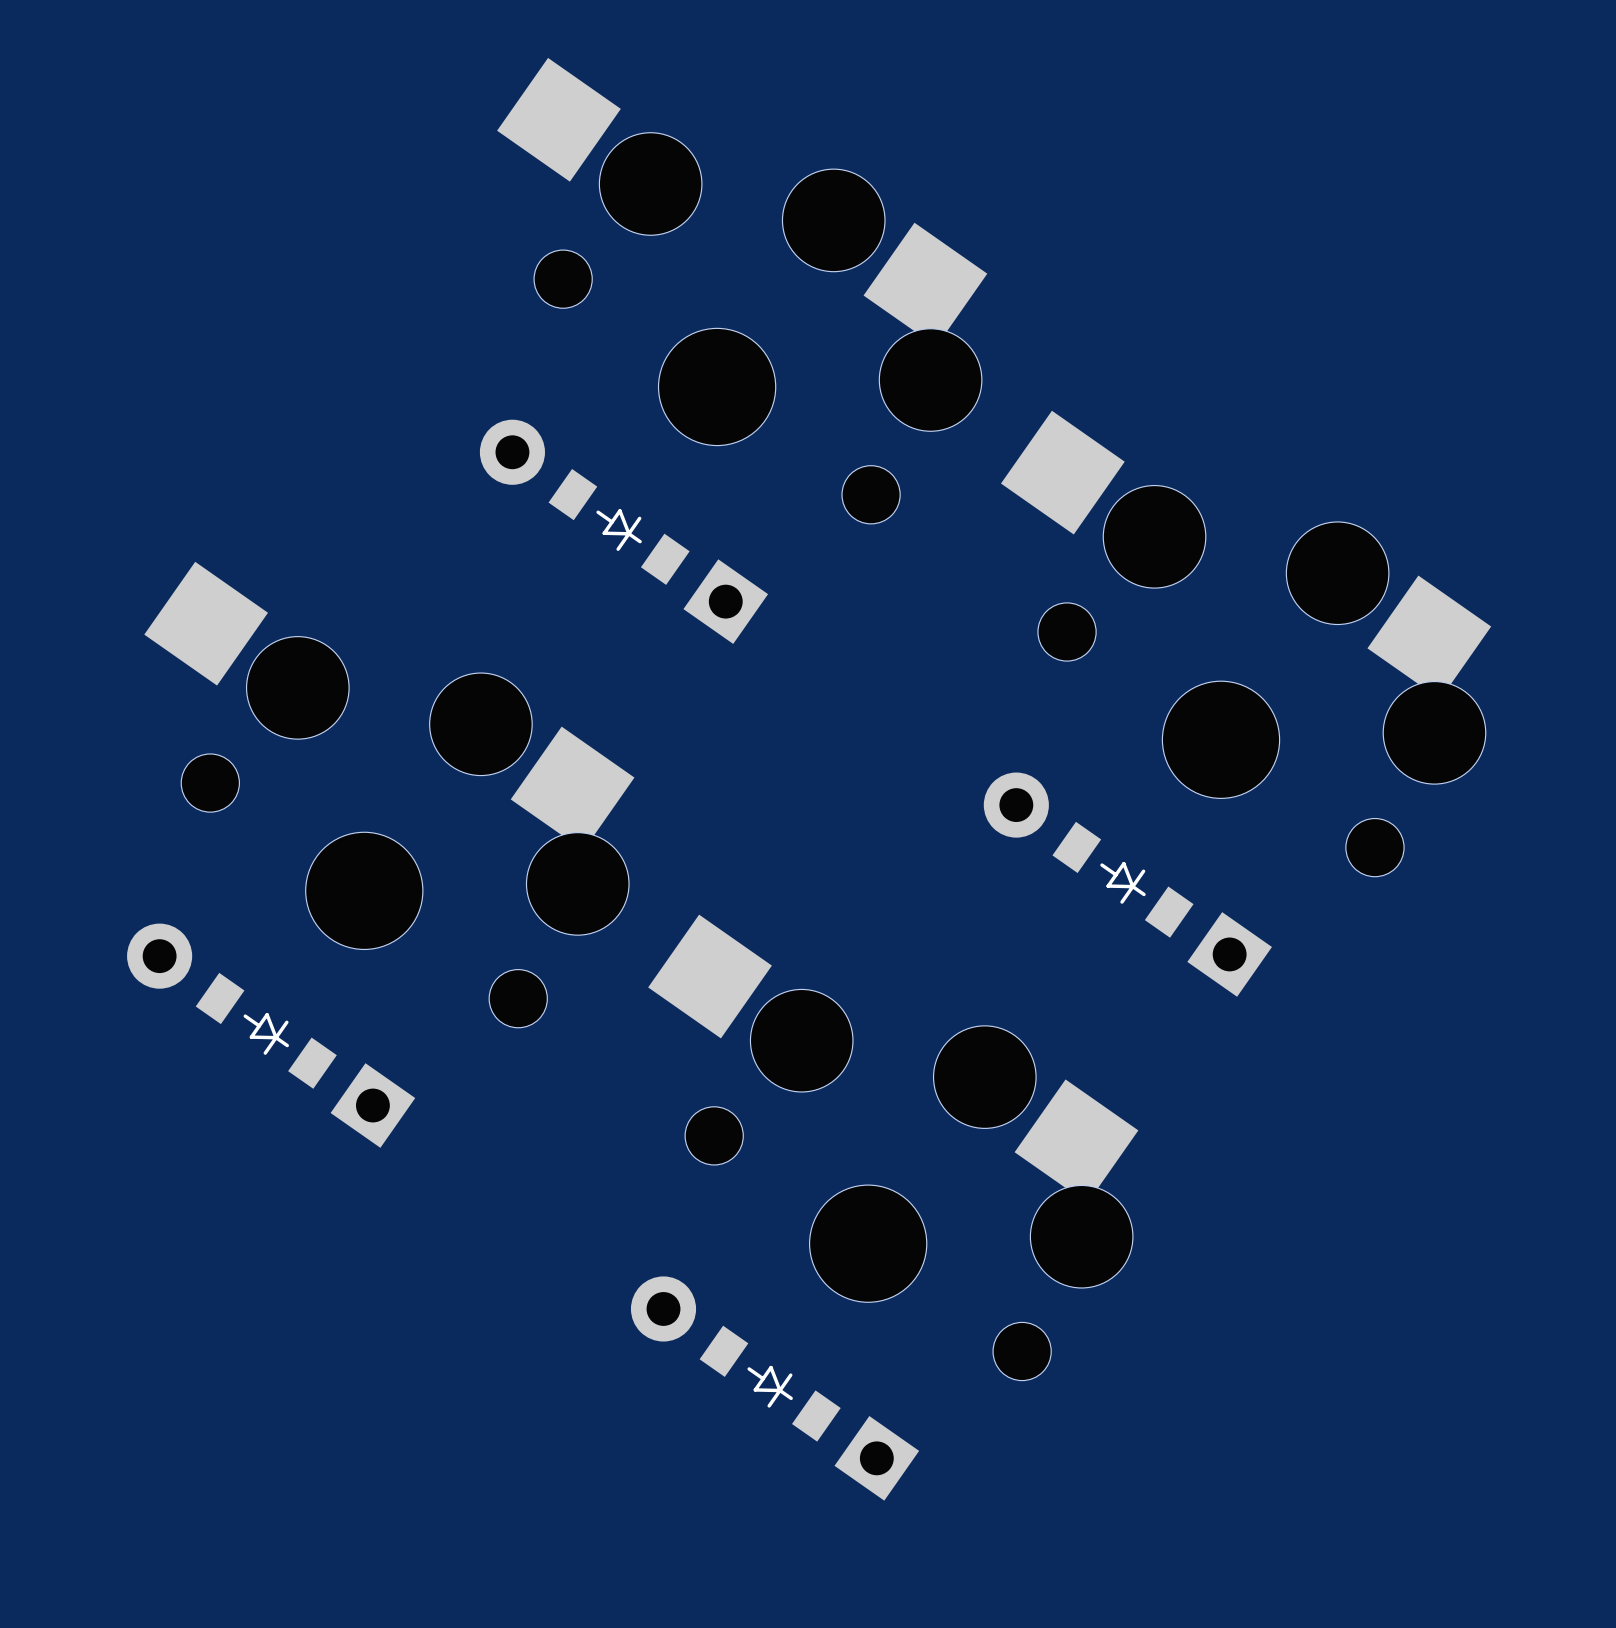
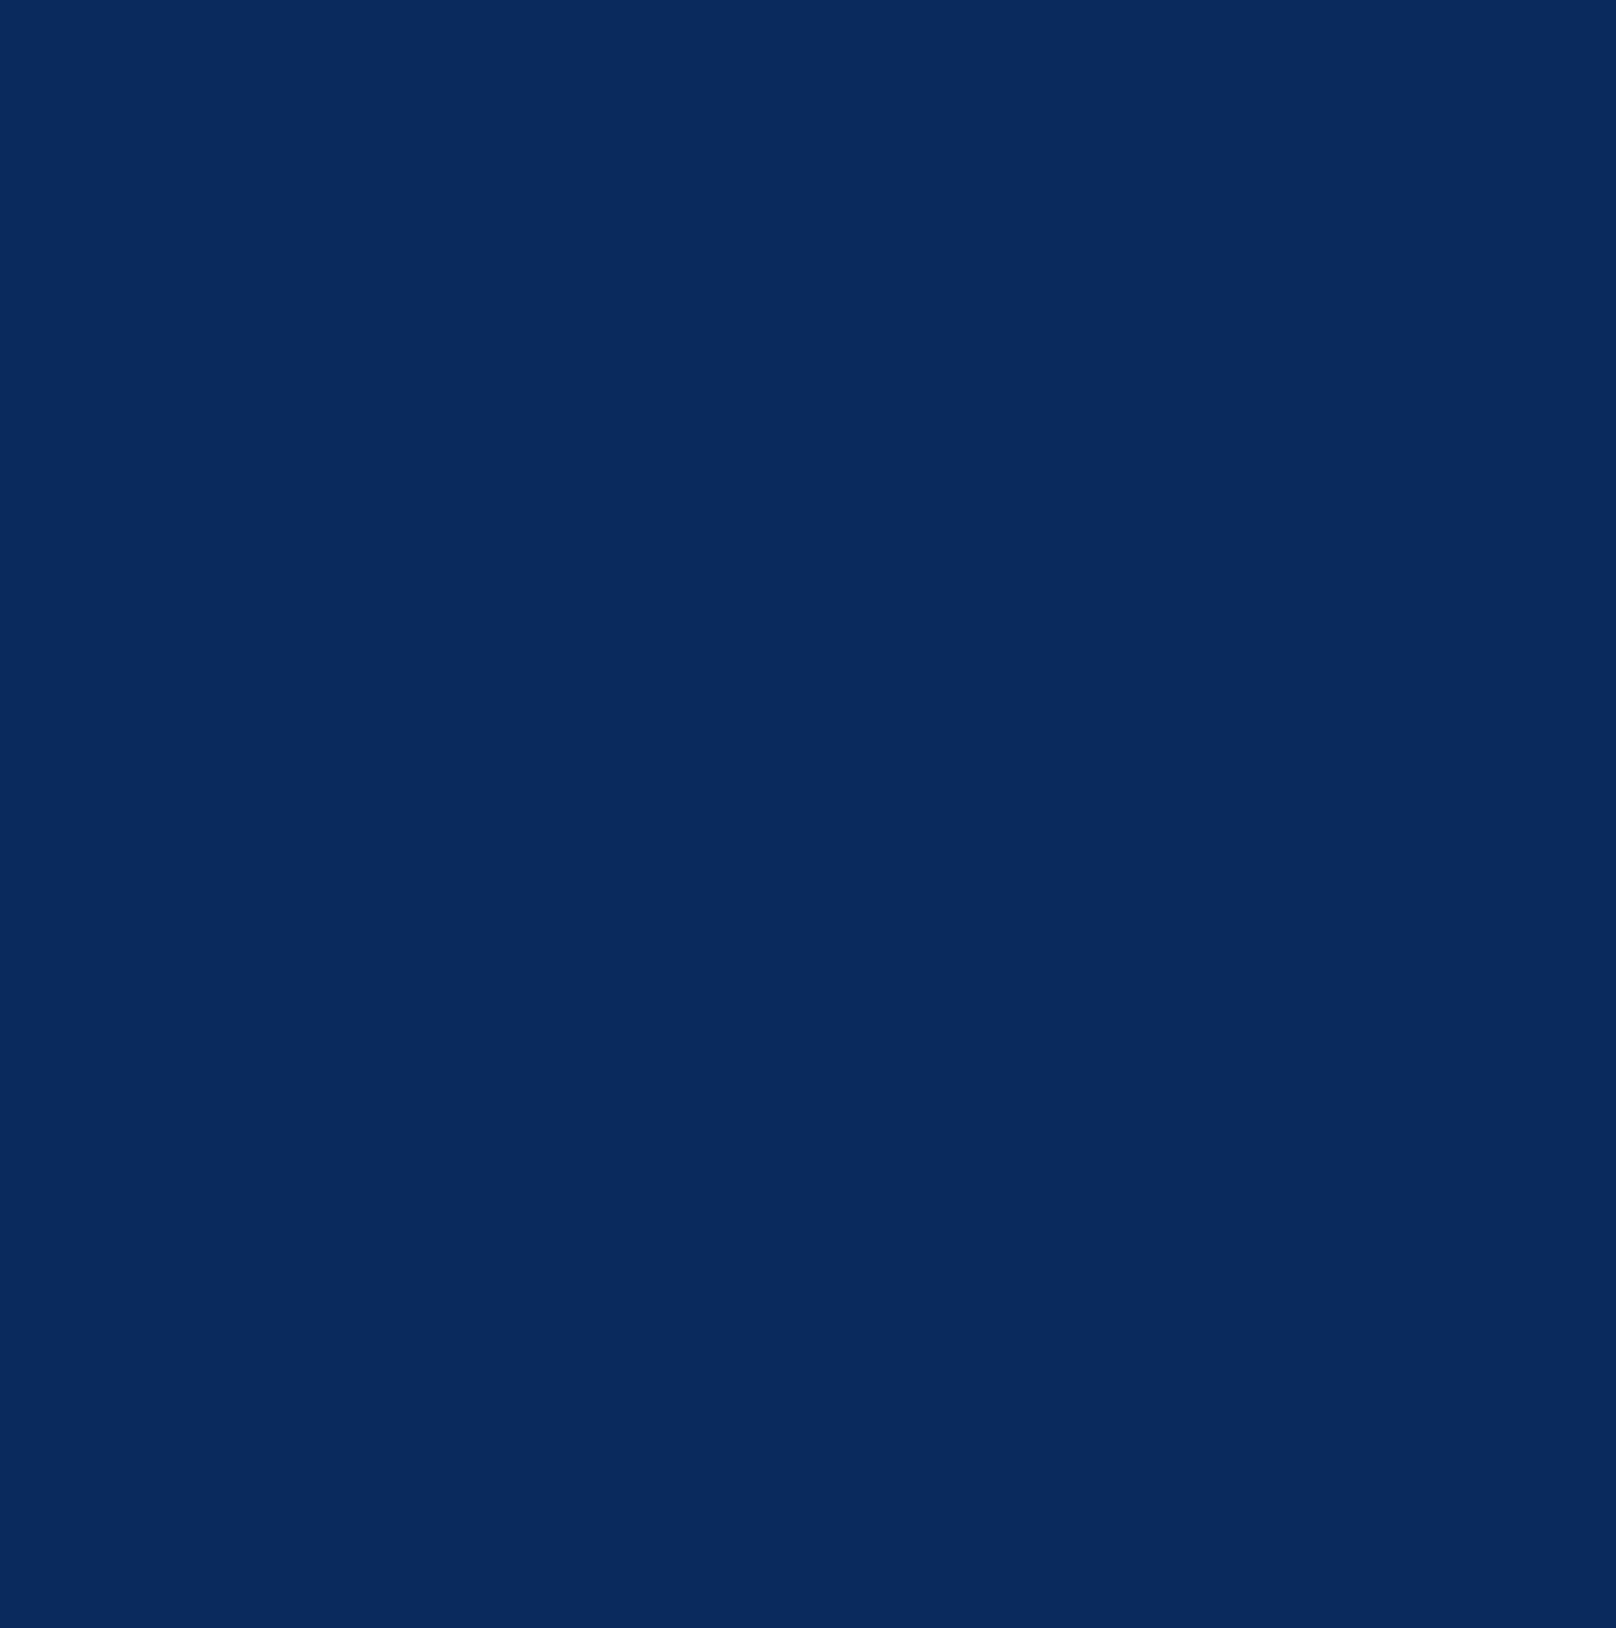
part: (742, 290) -> none
part: (623, 531) -> none
part: (1246, 643) -> none
part: (389, 794) -> none
part: (1127, 884) -> none
part: (271, 1035) -> none
part: (893, 1147) -> none
part: (775, 1388) -> none

